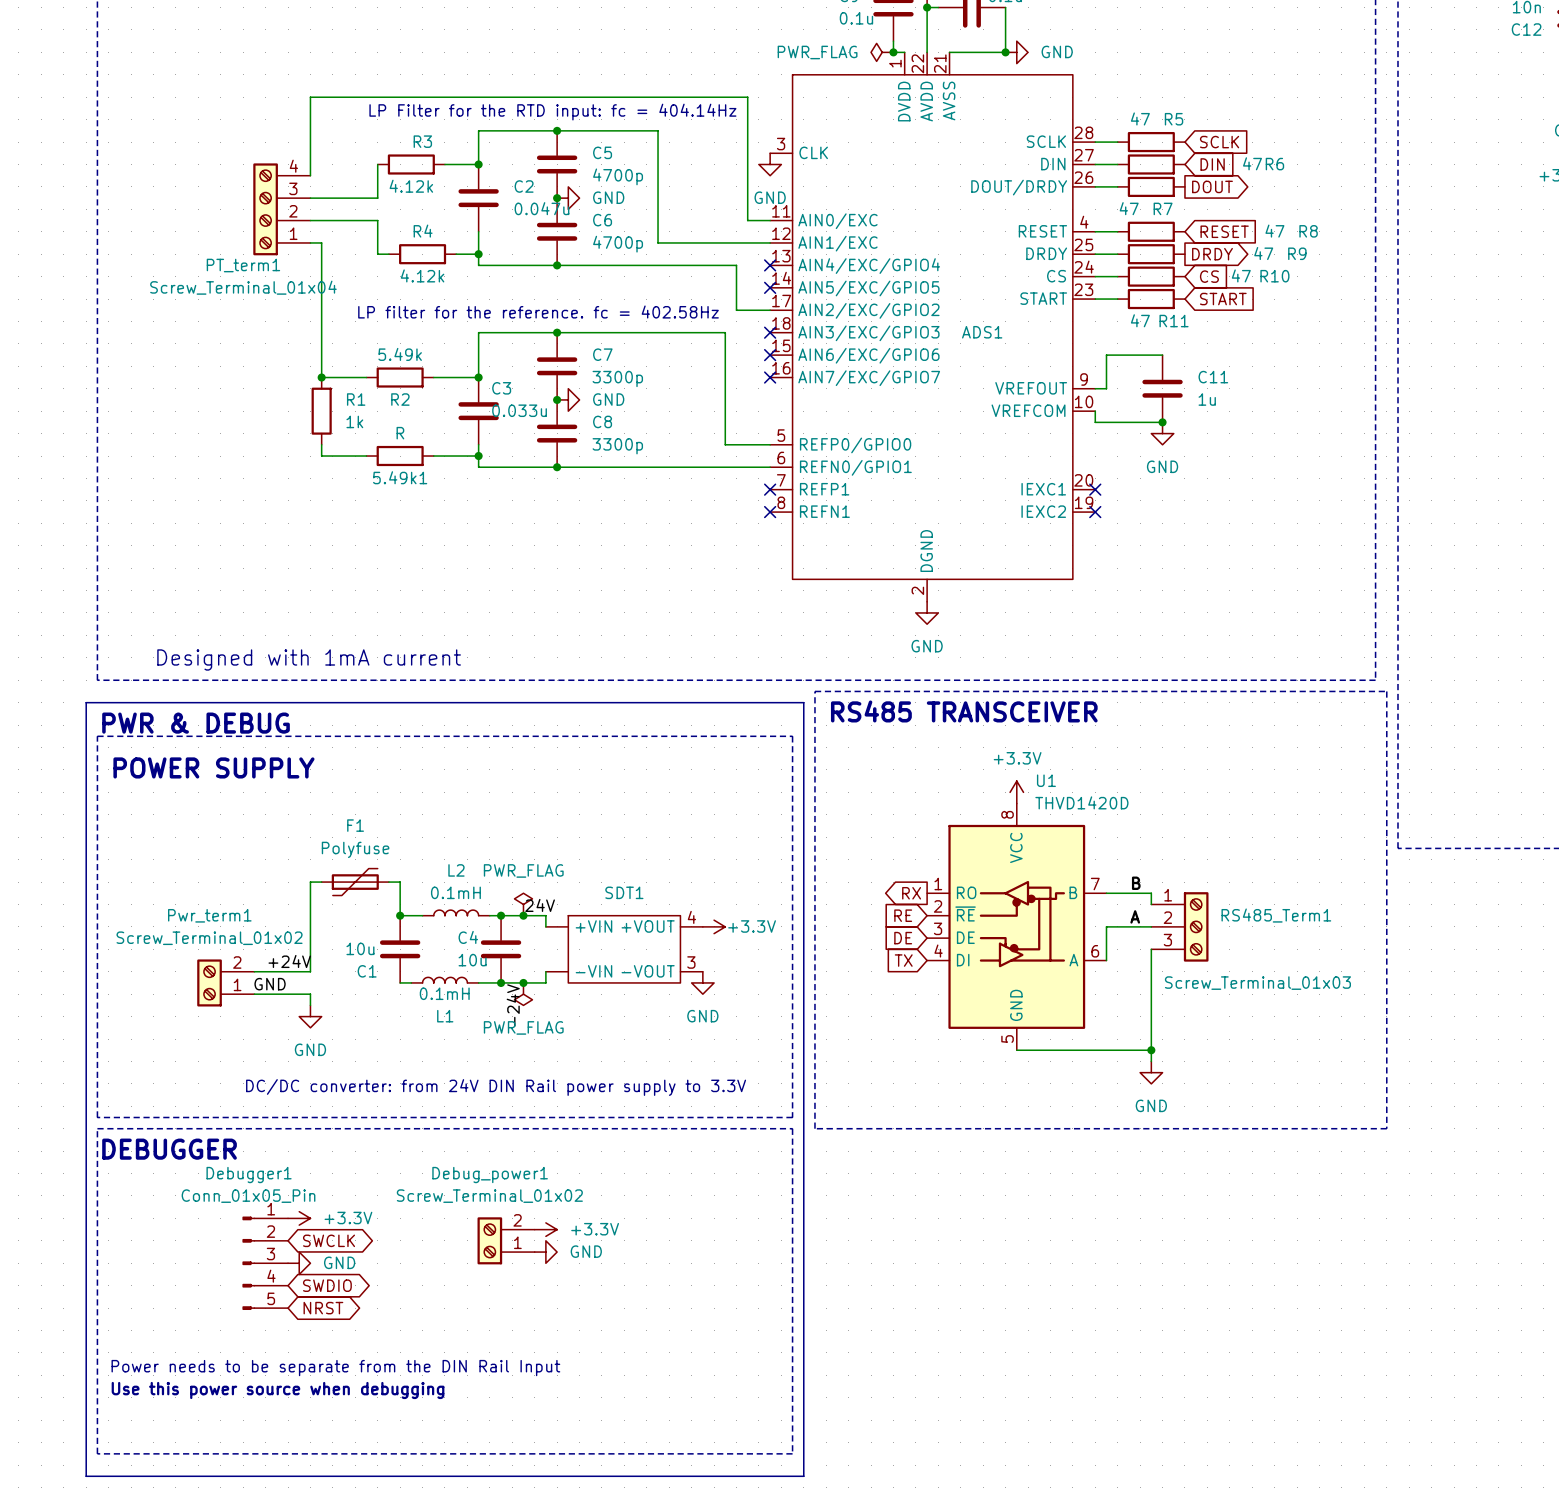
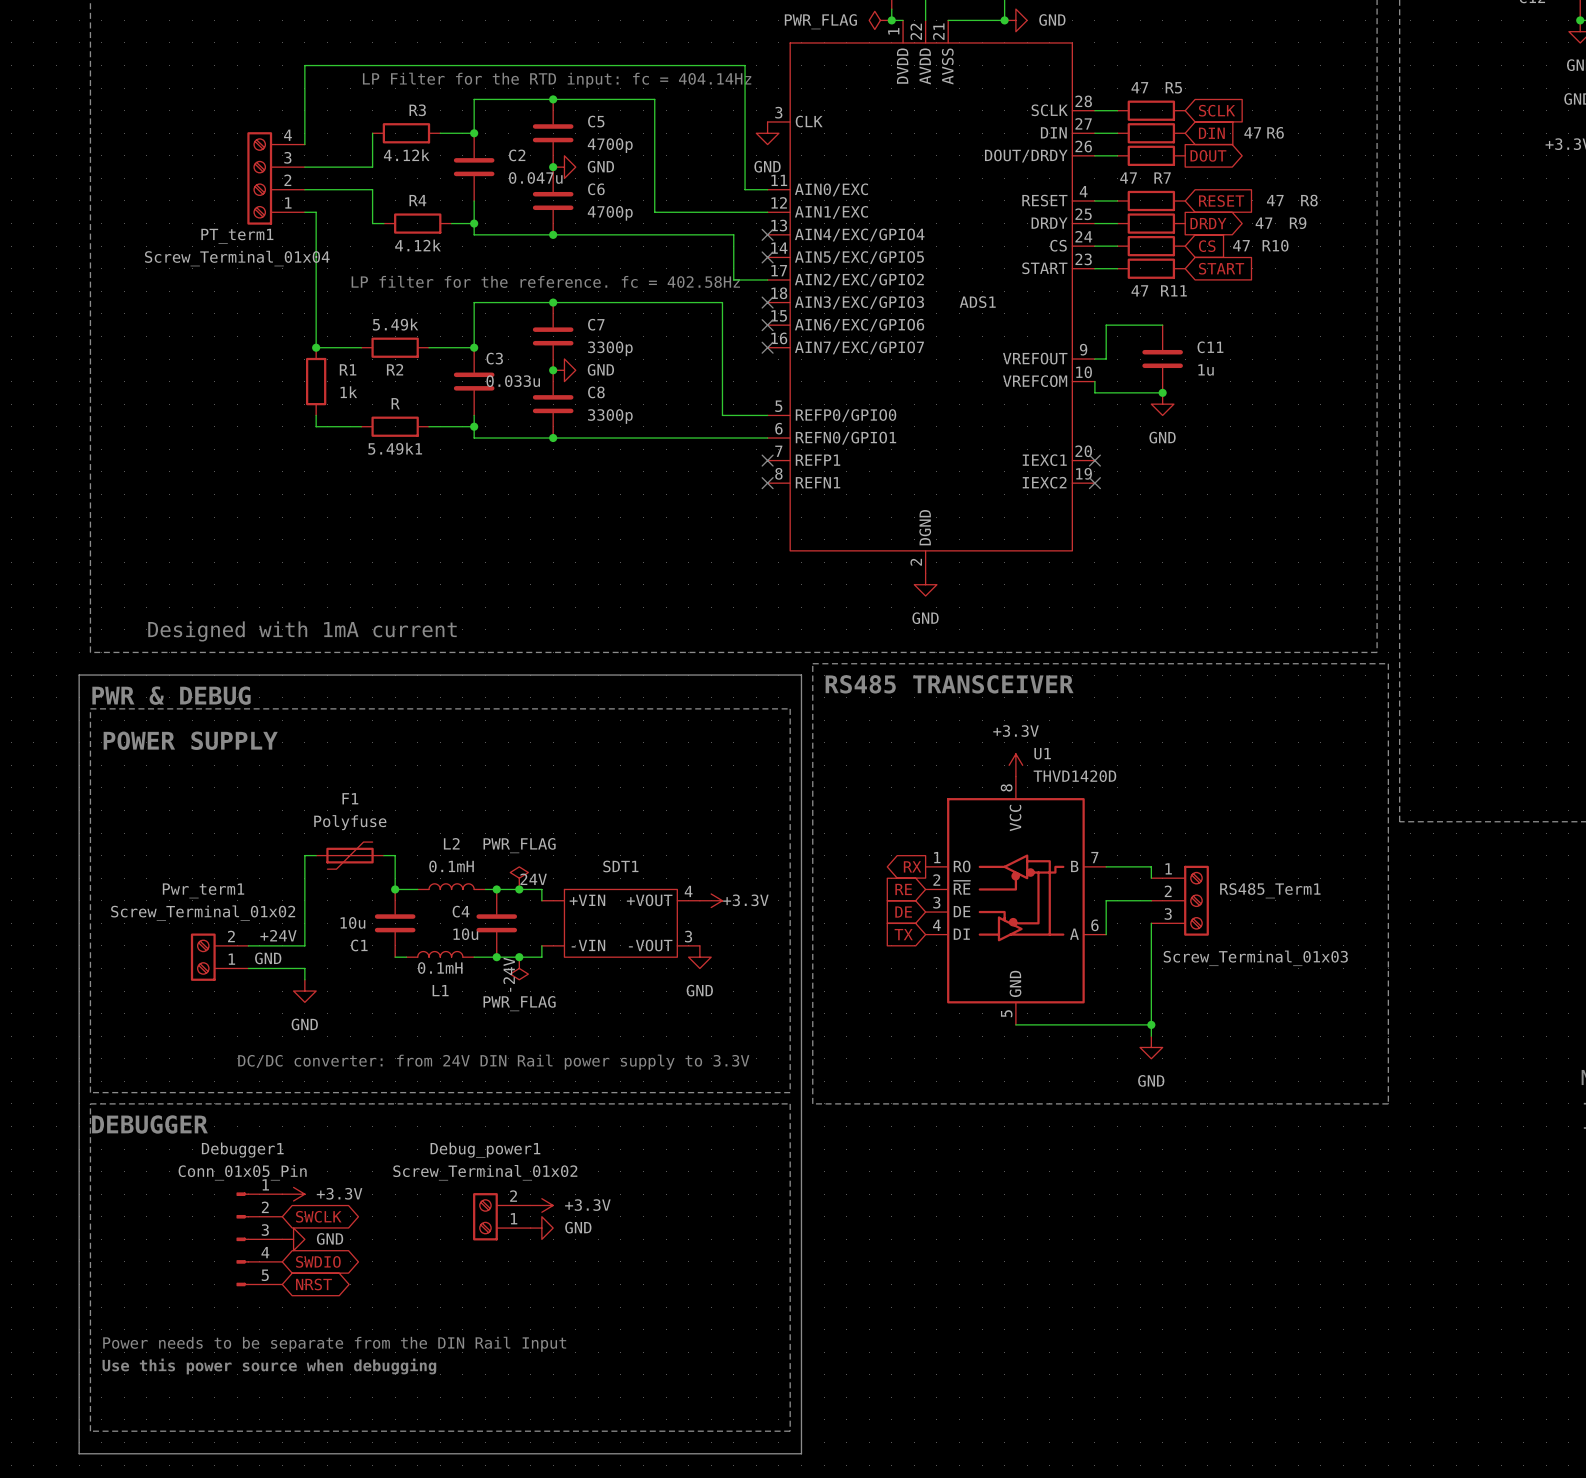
label: B (1136, 883) -> none
label: A (1135, 916) -> none

